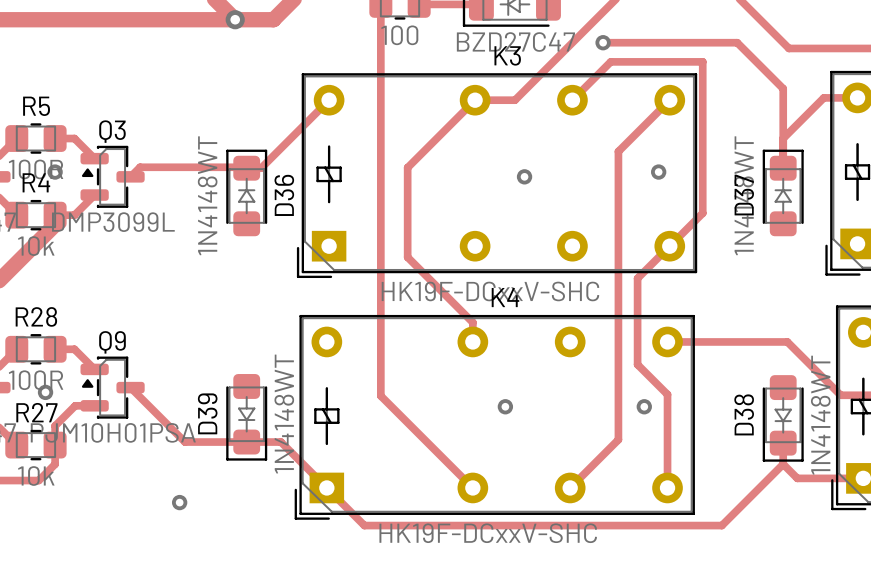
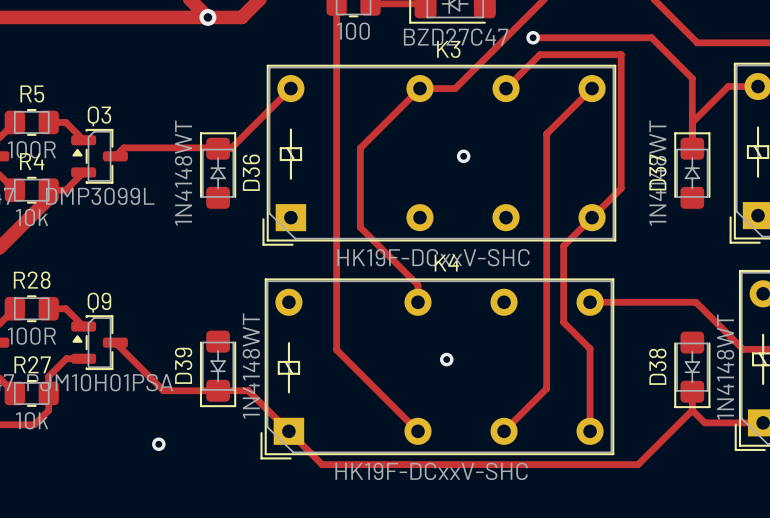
via: (55, 172) -> none
via: (658, 172) -> none
via: (45, 392) -> none
via: (644, 406) -> none

